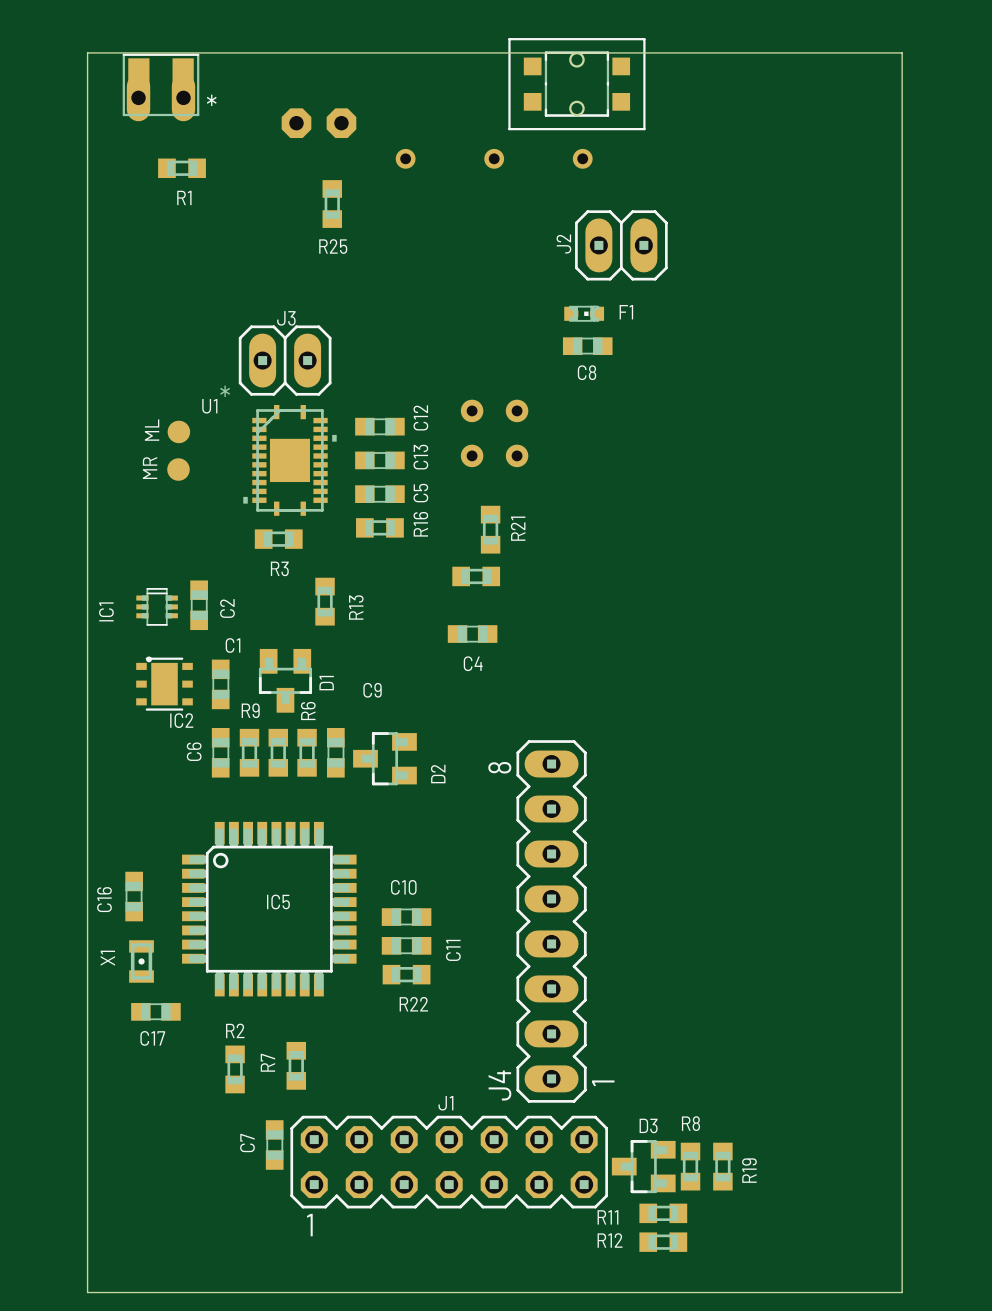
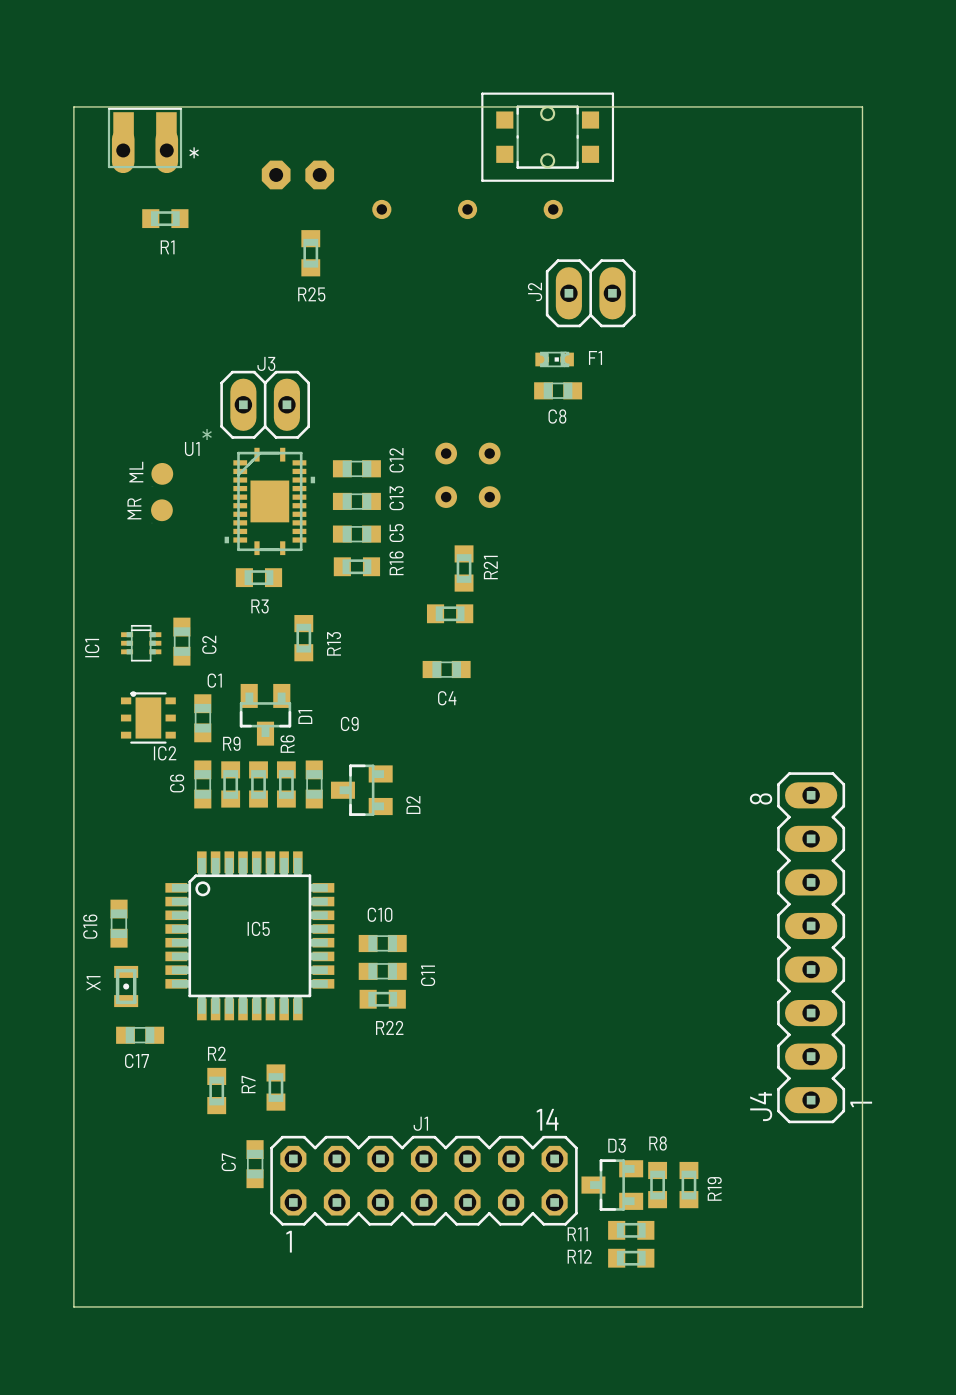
J4 position: (551, 921) -> (811, 947)
J1 text: none -> 14 (547, 1119)

